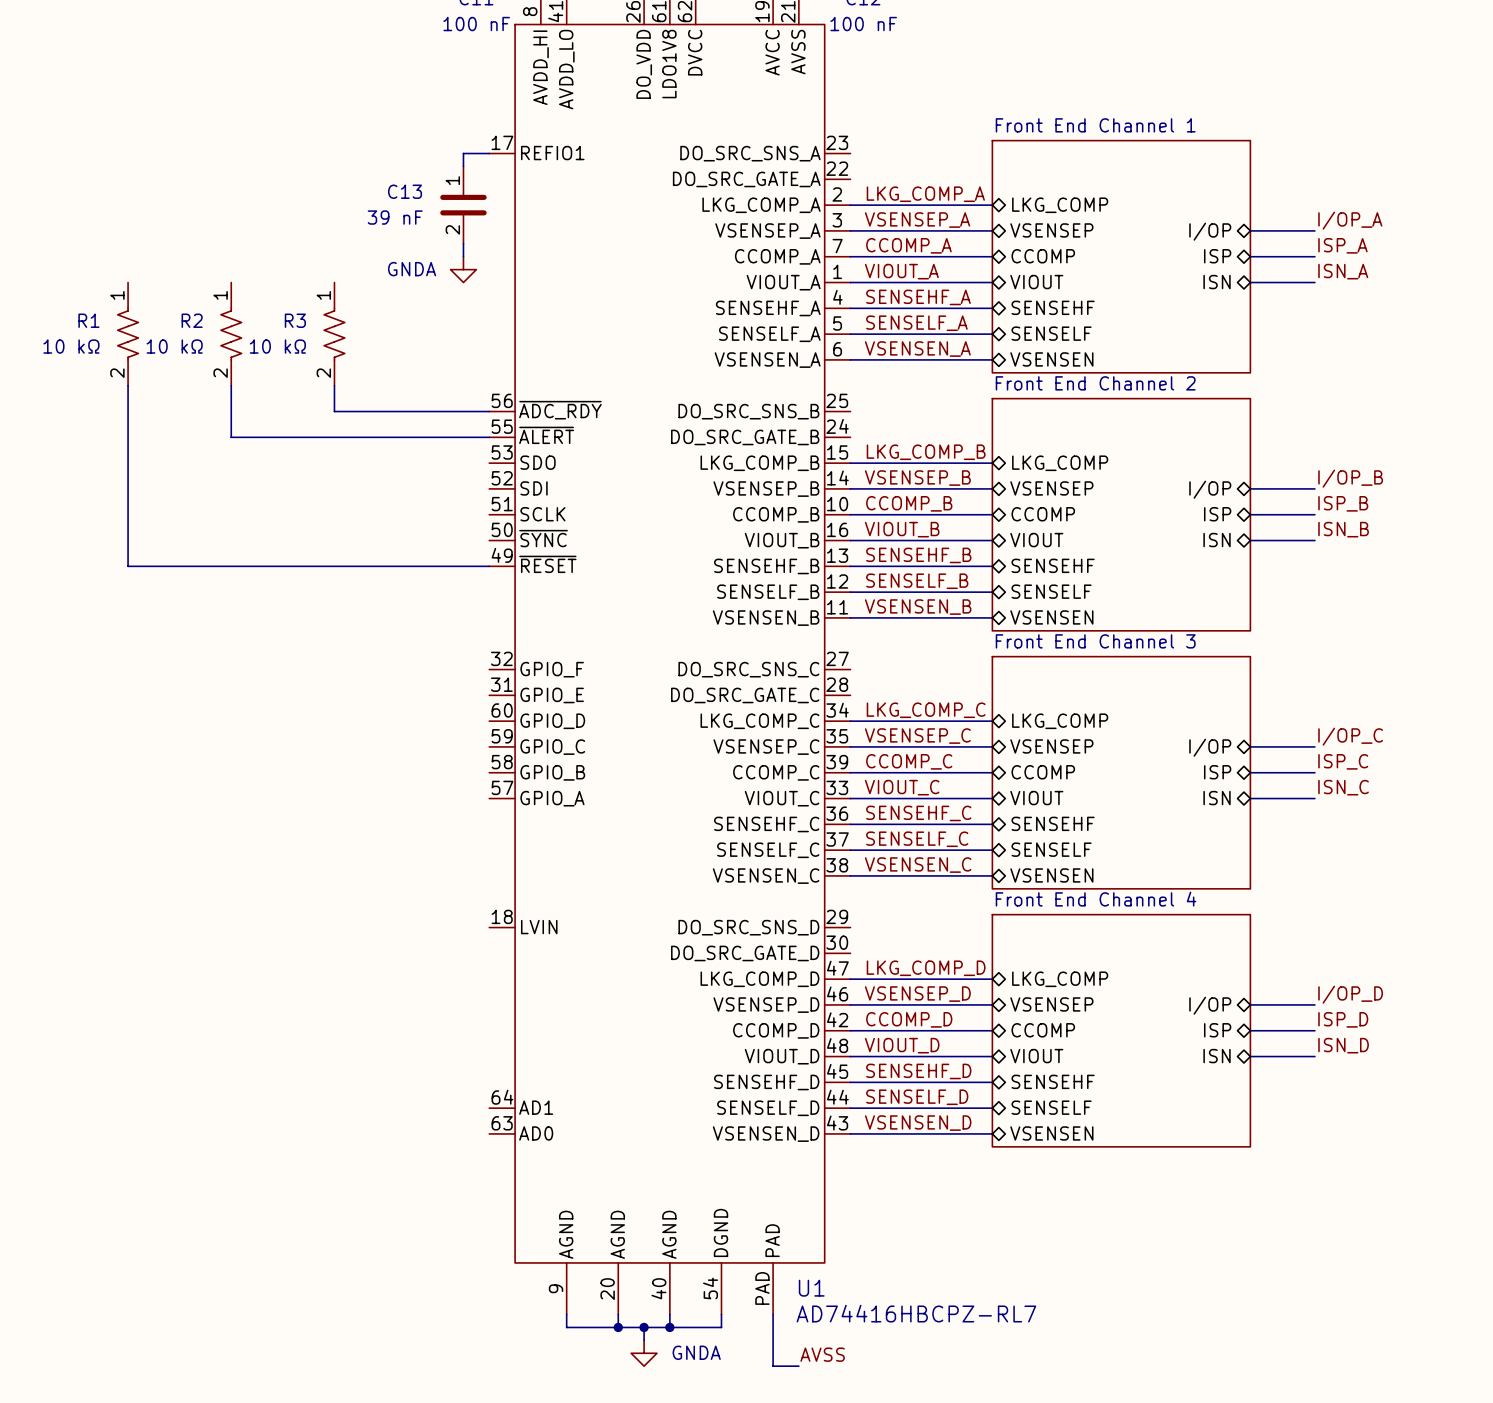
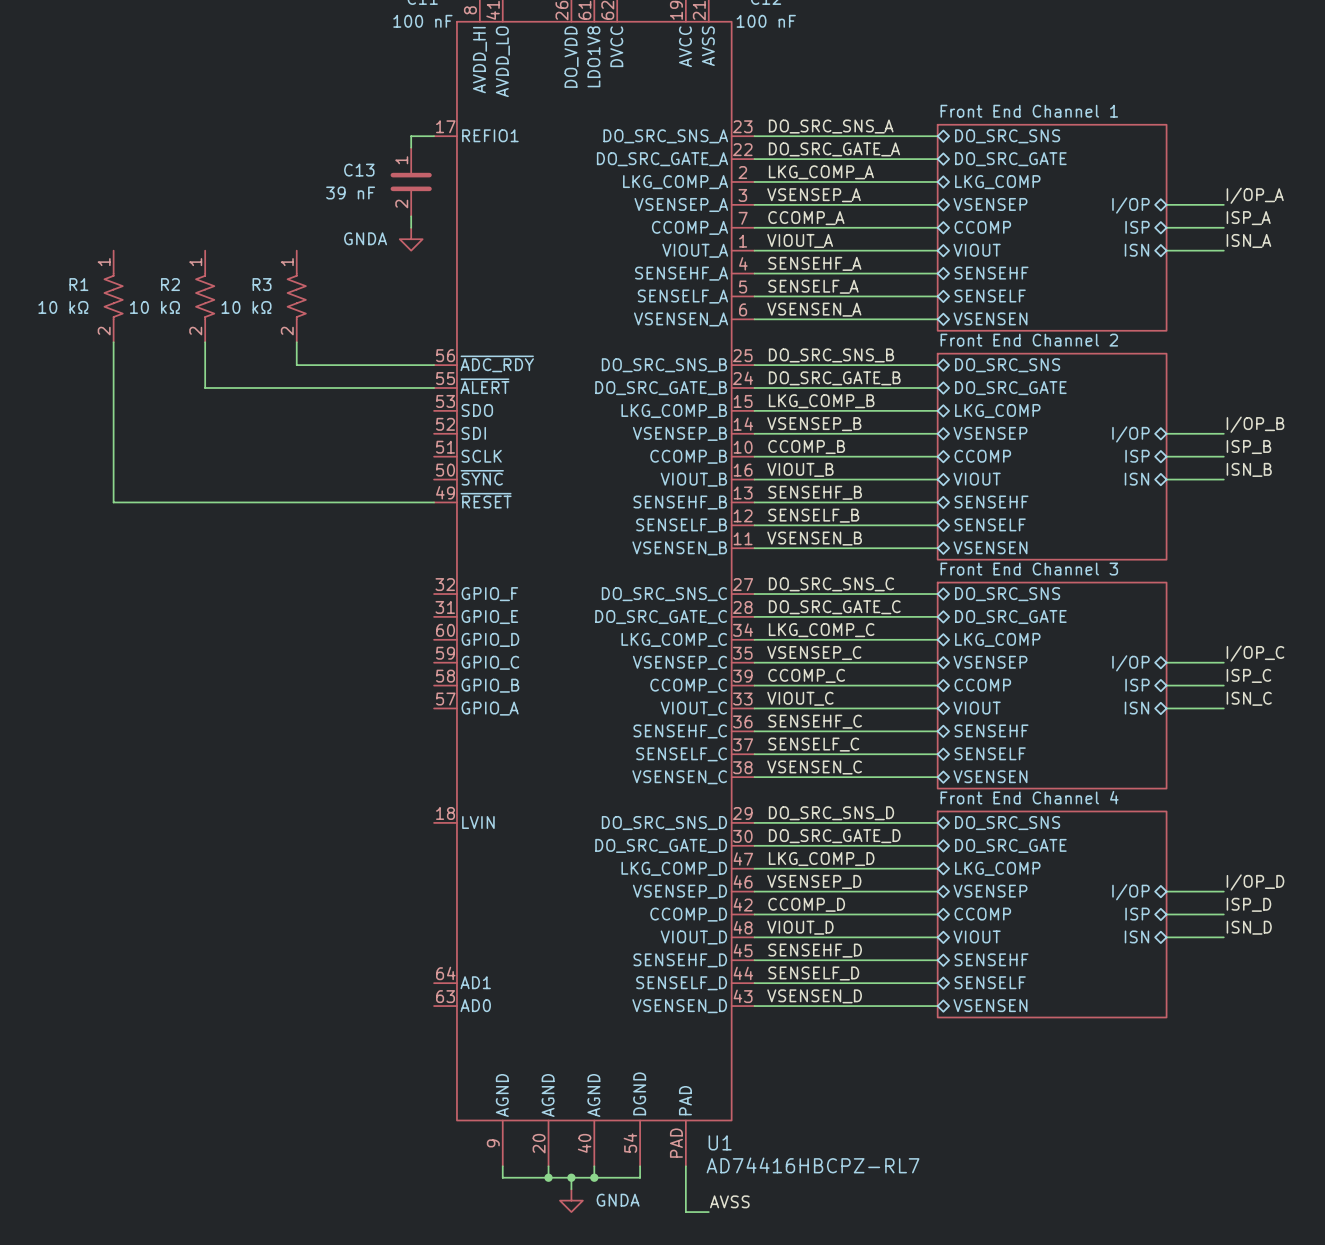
label: none -> DO_SRC_SNS_A (831, 126)
wire: none -> (754, 136) (937, 136)
sheet pin: none -> DO_SRC_SNS (1007, 136)
label: none -> DO_SRC_GATE_A (834, 149)
wire: none -> (754, 159) (937, 159)
sheet pin: none -> DO_SRC_GATE (1010, 159)
wire: none -> (880, 181) (937, 181)
sheet pin position: LKG_COMP (1060, 205) -> LKG_COMP (997, 182)
label position: I/OP_A (1350, 220) -> I/OP_A (1255, 195)
wire: none -> (880, 204) (937, 204)
sheet pin position: VSENSEP (1051, 230) -> VSENSEP (990, 204)
wire: (1250, 230) (1314, 230) -> (1223, 204) (1166, 204)
sheet pin position: I/OP (1210, 231) -> I/OP (1130, 205)
label position: ISP_A (1342, 245) -> ISP_A (1248, 218)
wire: none -> (880, 227) (937, 227)
sheet pin position: CCOMP (1043, 256) -> CCOMP (982, 227)
sheet Front End Channel 1 position: (1121, 256) -> (1052, 227)
sheet pin position: ISP (1217, 256) -> ISP (1137, 227)
wire: (1250, 256) (1314, 256) -> (1223, 227) (1166, 227)
label position: ISN_A (1343, 271) -> ISN_A (1248, 240)
wire: none -> (880, 250) (937, 250)
sheet pin position: VIOUT (1036, 282) -> VIOUT (977, 250)
sheet pin position: ISN (1217, 282) -> ISN (1136, 250)
wire: (1250, 282) (1314, 282) -> (1223, 250) (1166, 250)
sheet pin position: SENSEHF (1053, 307) -> SENSEHF (991, 273)
wire: none -> (880, 273) (937, 273)
sheet pin position: SENSELF (1051, 333) -> SENSELF (990, 296)
wire: none -> (880, 296) (937, 296)
wire: none -> (880, 319) (937, 319)
sheet pin position: VSENSEN (1051, 359) -> VSENSEN (990, 318)
label: none -> DO_SRC_SNS_B (831, 355)
wire: none -> (754, 365) (937, 365)
sheet pin: none -> DO_SRC_SNS (1007, 365)
label: none -> DO_SRC_GATE_B (834, 378)
wire: none -> (754, 388) (937, 388)
sheet pin: none -> DO_SRC_GATE (1010, 388)
wire: none -> (880, 410) (937, 410)
sheet pin position: LKG_COMP (1060, 463) -> LKG_COMP (997, 411)
label position: I/OP_B (1350, 478) -> I/OP_B (1255, 424)
wire: none -> (880, 433) (937, 433)
sheet pin position: VSENSEP (1051, 488) -> VSENSEP (990, 433)
wire: (1250, 488) (1314, 488) -> (1223, 433) (1166, 433)
sheet pin position: I/OP (1210, 489) -> I/OP (1130, 434)
label position: ISP_B (1343, 503) -> ISP_B (1248, 447)
wire: none -> (880, 456) (937, 456)
sheet pin position: CCOMP (1043, 514) -> CCOMP (982, 456)
sheet Front End Channel 2 position: (1121, 514) -> (1052, 456)
sheet pin position: ISP (1217, 514) -> ISP (1137, 456)
wire: (1250, 514) (1314, 514) -> (1223, 456) (1166, 456)
label position: ISN_B (1343, 529) -> ISN_B (1249, 469)
wire: none -> (880, 479) (937, 479)
sheet pin position: VIOUT (1036, 540) -> VIOUT (977, 479)
sheet pin position: ISN (1217, 540) -> ISN (1136, 479)
wire: (1250, 540) (1314, 540) -> (1223, 479) (1166, 479)
sheet pin position: SENSEHF (1053, 565) -> SENSEHF (991, 502)
wire: none -> (880, 502) (937, 502)
sheet pin position: SENSELF (1051, 591) -> SENSELF (990, 524)
wire: none -> (880, 525) (937, 525)
wire: none -> (880, 548) (937, 548)
sheet pin position: VSENSEN (1051, 617) -> VSENSEN (990, 547)
label: none -> DO_SRC_SNS_C (831, 584)
wire: none -> (754, 594) (937, 594)
sheet pin: none -> DO_SRC_SNS (1007, 594)
label: none -> DO_SRC_GATE_C (834, 607)
wire: none -> (754, 616) (937, 616)
sheet pin: none -> DO_SRC_GATE (1010, 617)
wire: none -> (880, 639) (937, 639)
sheet pin position: LKG_COMP (1060, 721) -> LKG_COMP (997, 639)
label position: I/OP_C (1350, 736) -> I/OP_C (1255, 653)
wire: none -> (880, 662) (937, 662)
sheet pin position: VSENSEP (1051, 746) -> VSENSEP (990, 662)
wire: (1250, 746) (1314, 746) -> (1223, 662) (1166, 662)
sheet pin position: I/OP (1210, 747) -> I/OP (1130, 663)
label position: ISP_C (1343, 761) -> ISP_C (1248, 675)
wire: none -> (880, 685) (937, 685)
sheet pin position: CCOMP (1043, 772) -> CCOMP (982, 685)
sheet Front End Channel 3 position: (1121, 772) -> (1052, 685)
sheet pin position: ISP (1217, 772) -> ISP (1137, 685)
wire: (1250, 772) (1314, 772) -> (1223, 685) (1166, 685)
label position: ISN_C (1343, 787) -> ISN_C (1249, 698)
wire: none -> (880, 708) (937, 708)
sheet pin position: VIOUT (1036, 798) -> VIOUT (977, 708)
sheet pin position: ISN (1217, 798) -> ISN (1136, 708)
wire: (1250, 798) (1314, 798) -> (1223, 708) (1166, 708)
sheet pin position: SENSEHF (1053, 823) -> SENSEHF (991, 730)
wire: none -> (880, 731) (937, 731)
sheet pin position: SENSELF (1051, 849) -> SENSELF (990, 753)
wire: none -> (880, 754) (937, 754)
wire: none -> (880, 777) (937, 777)
sheet pin position: VSENSEN (1051, 875) -> VSENSEN (990, 776)
label: none -> DO_SRC_SNS_D (831, 813)
wire: none -> (754, 822) (937, 822)
sheet pin: none -> DO_SRC_SNS (1007, 823)
label: none -> DO_SRC_GATE_D (834, 836)
wire: none -> (754, 845) (937, 845)
sheet pin: none -> DO_SRC_GATE (1010, 845)
wire: none -> (880, 868) (937, 868)
sheet pin position: LKG_COMP (1060, 979) -> LKG_COMP (997, 868)
label position: I/OP_D (1350, 994) -> I/OP_D (1255, 882)
wire: none -> (880, 891) (937, 891)
sheet pin position: VSENSEP (1051, 1004) -> VSENSEP (990, 891)
wire: (1250, 1004) (1314, 1004) -> (1223, 891) (1166, 891)
sheet pin position: I/OP (1210, 1005) -> I/OP (1130, 892)
label position: ISP_D (1343, 1019) -> ISP_D (1248, 904)
wire: none -> (880, 914) (937, 914)
sheet pin position: CCOMP (1043, 1030) -> CCOMP (982, 914)
sheet Front End Channel 4 position: (1121, 1030) -> (1052, 914)
sheet pin position: ISP (1217, 1030) -> ISP (1137, 914)
wire: (1250, 1030) (1314, 1030) -> (1223, 914) (1166, 914)
label position: ISN_D (1343, 1045) -> ISN_D (1249, 927)
wire: none -> (880, 937) (937, 937)
sheet pin position: VIOUT (1036, 1056) -> VIOUT (977, 936)
sheet pin position: ISN (1217, 1056) -> ISN (1136, 936)
wire: (1250, 1056) (1314, 1056) -> (1223, 937) (1166, 937)
sheet pin position: SENSEHF (1053, 1081) -> SENSEHF (991, 959)
wire: none -> (880, 960) (937, 960)
sheet pin position: SENSELF (1051, 1107) -> SENSELF (990, 982)
wire: none -> (880, 983) (937, 983)
wire: none -> (880, 1006) (937, 1006)
sheet pin position: VSENSEN (1051, 1133) -> VSENSEN (990, 1005)

